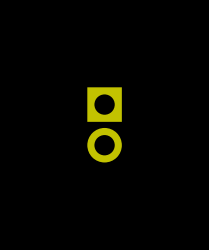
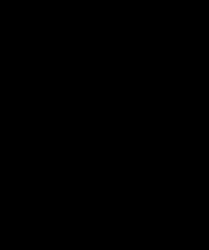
part: (104, 124) -> none

